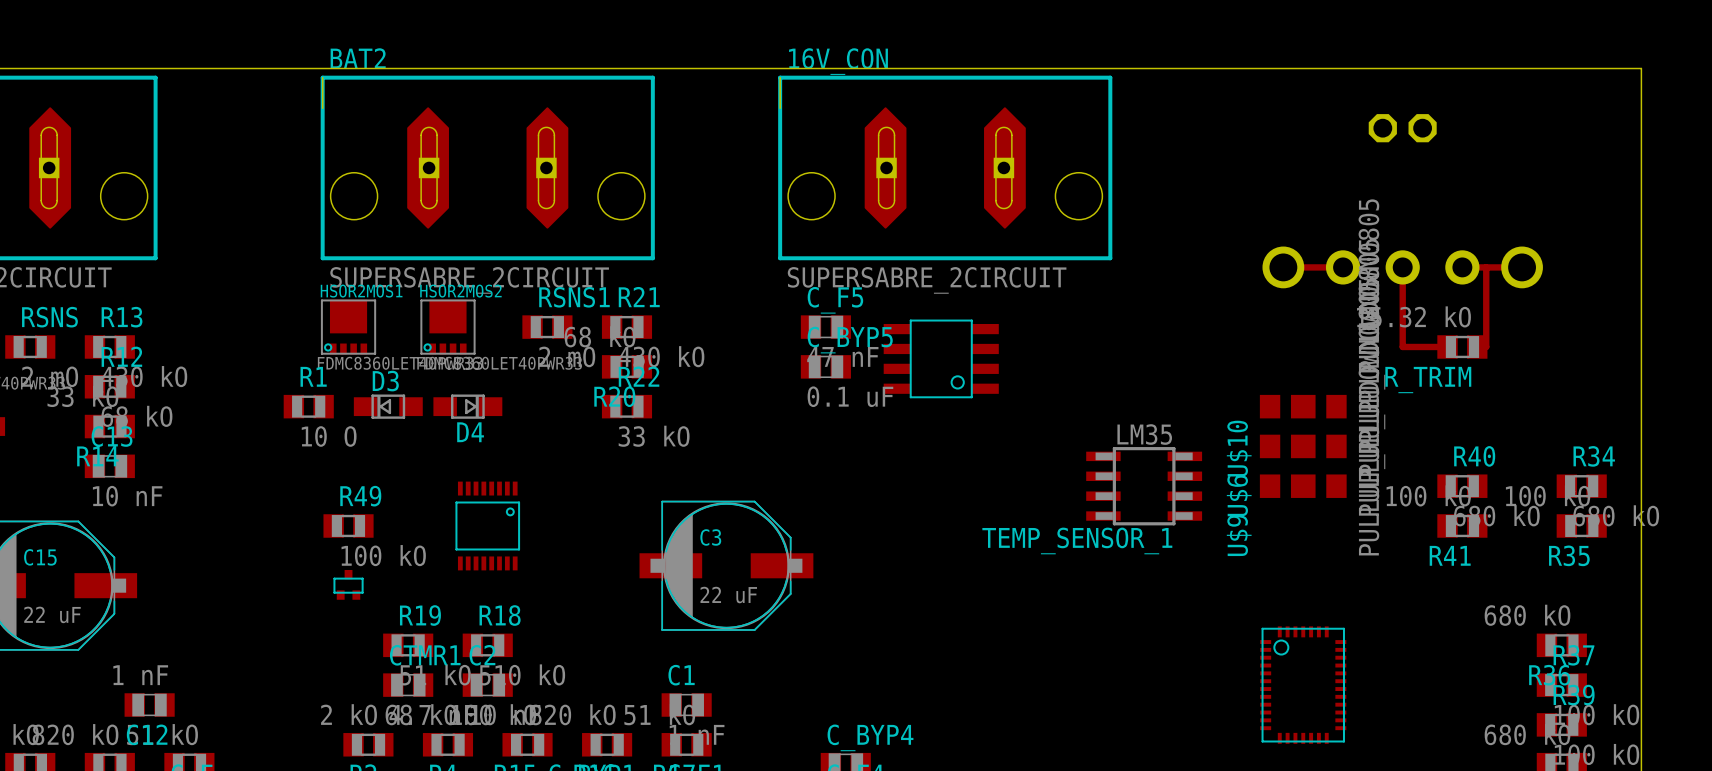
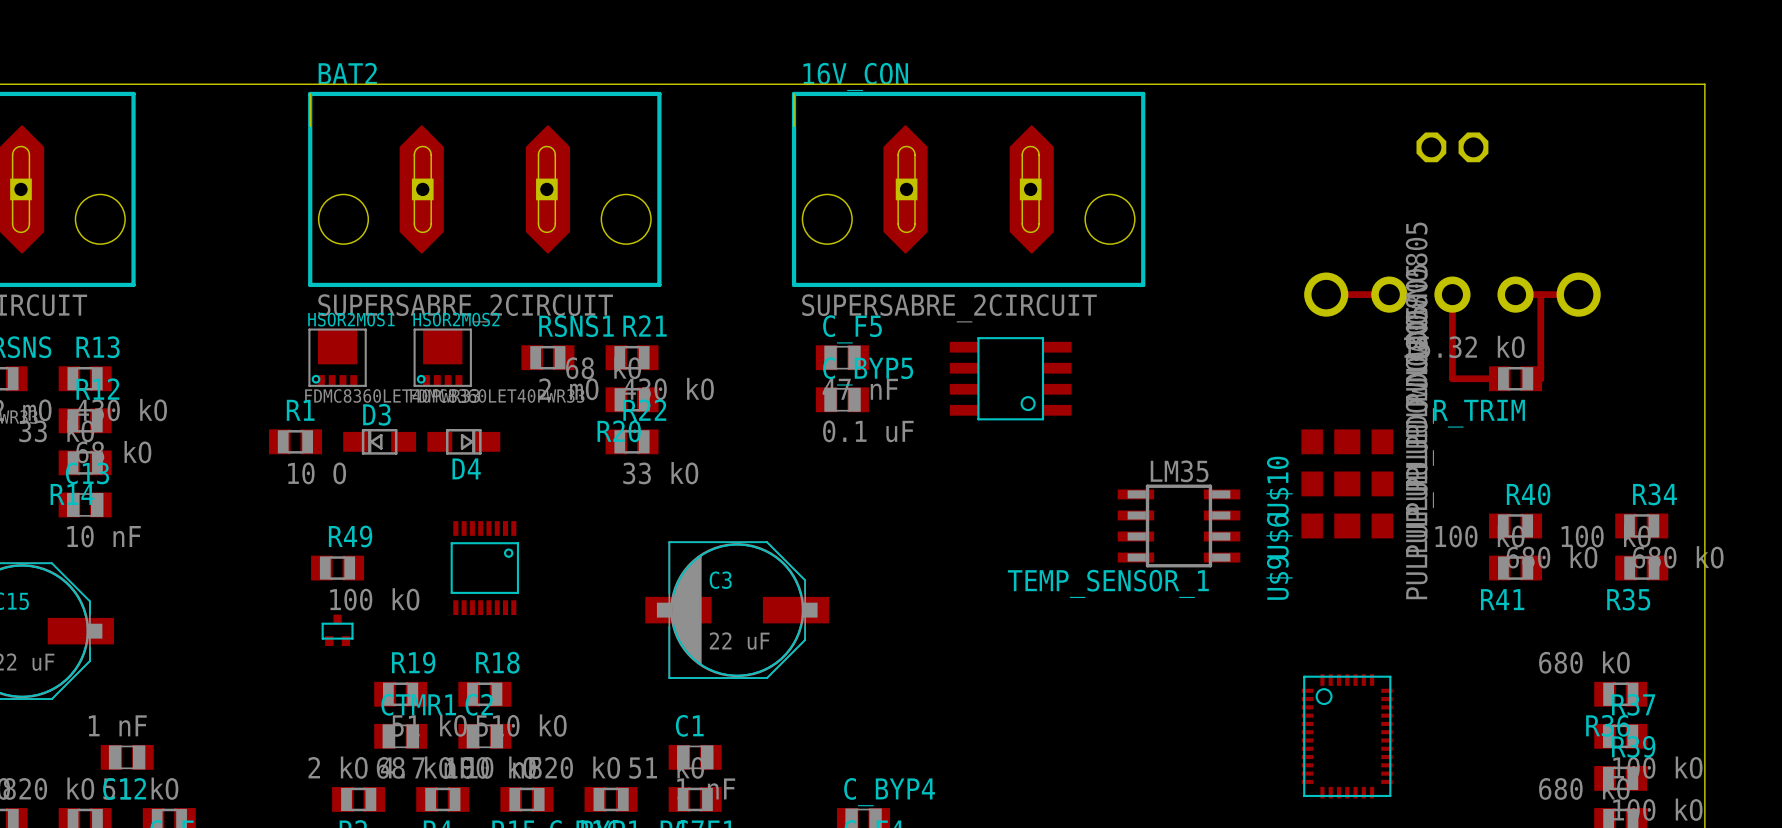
part position: (941, 358) -> (1010, 378)

